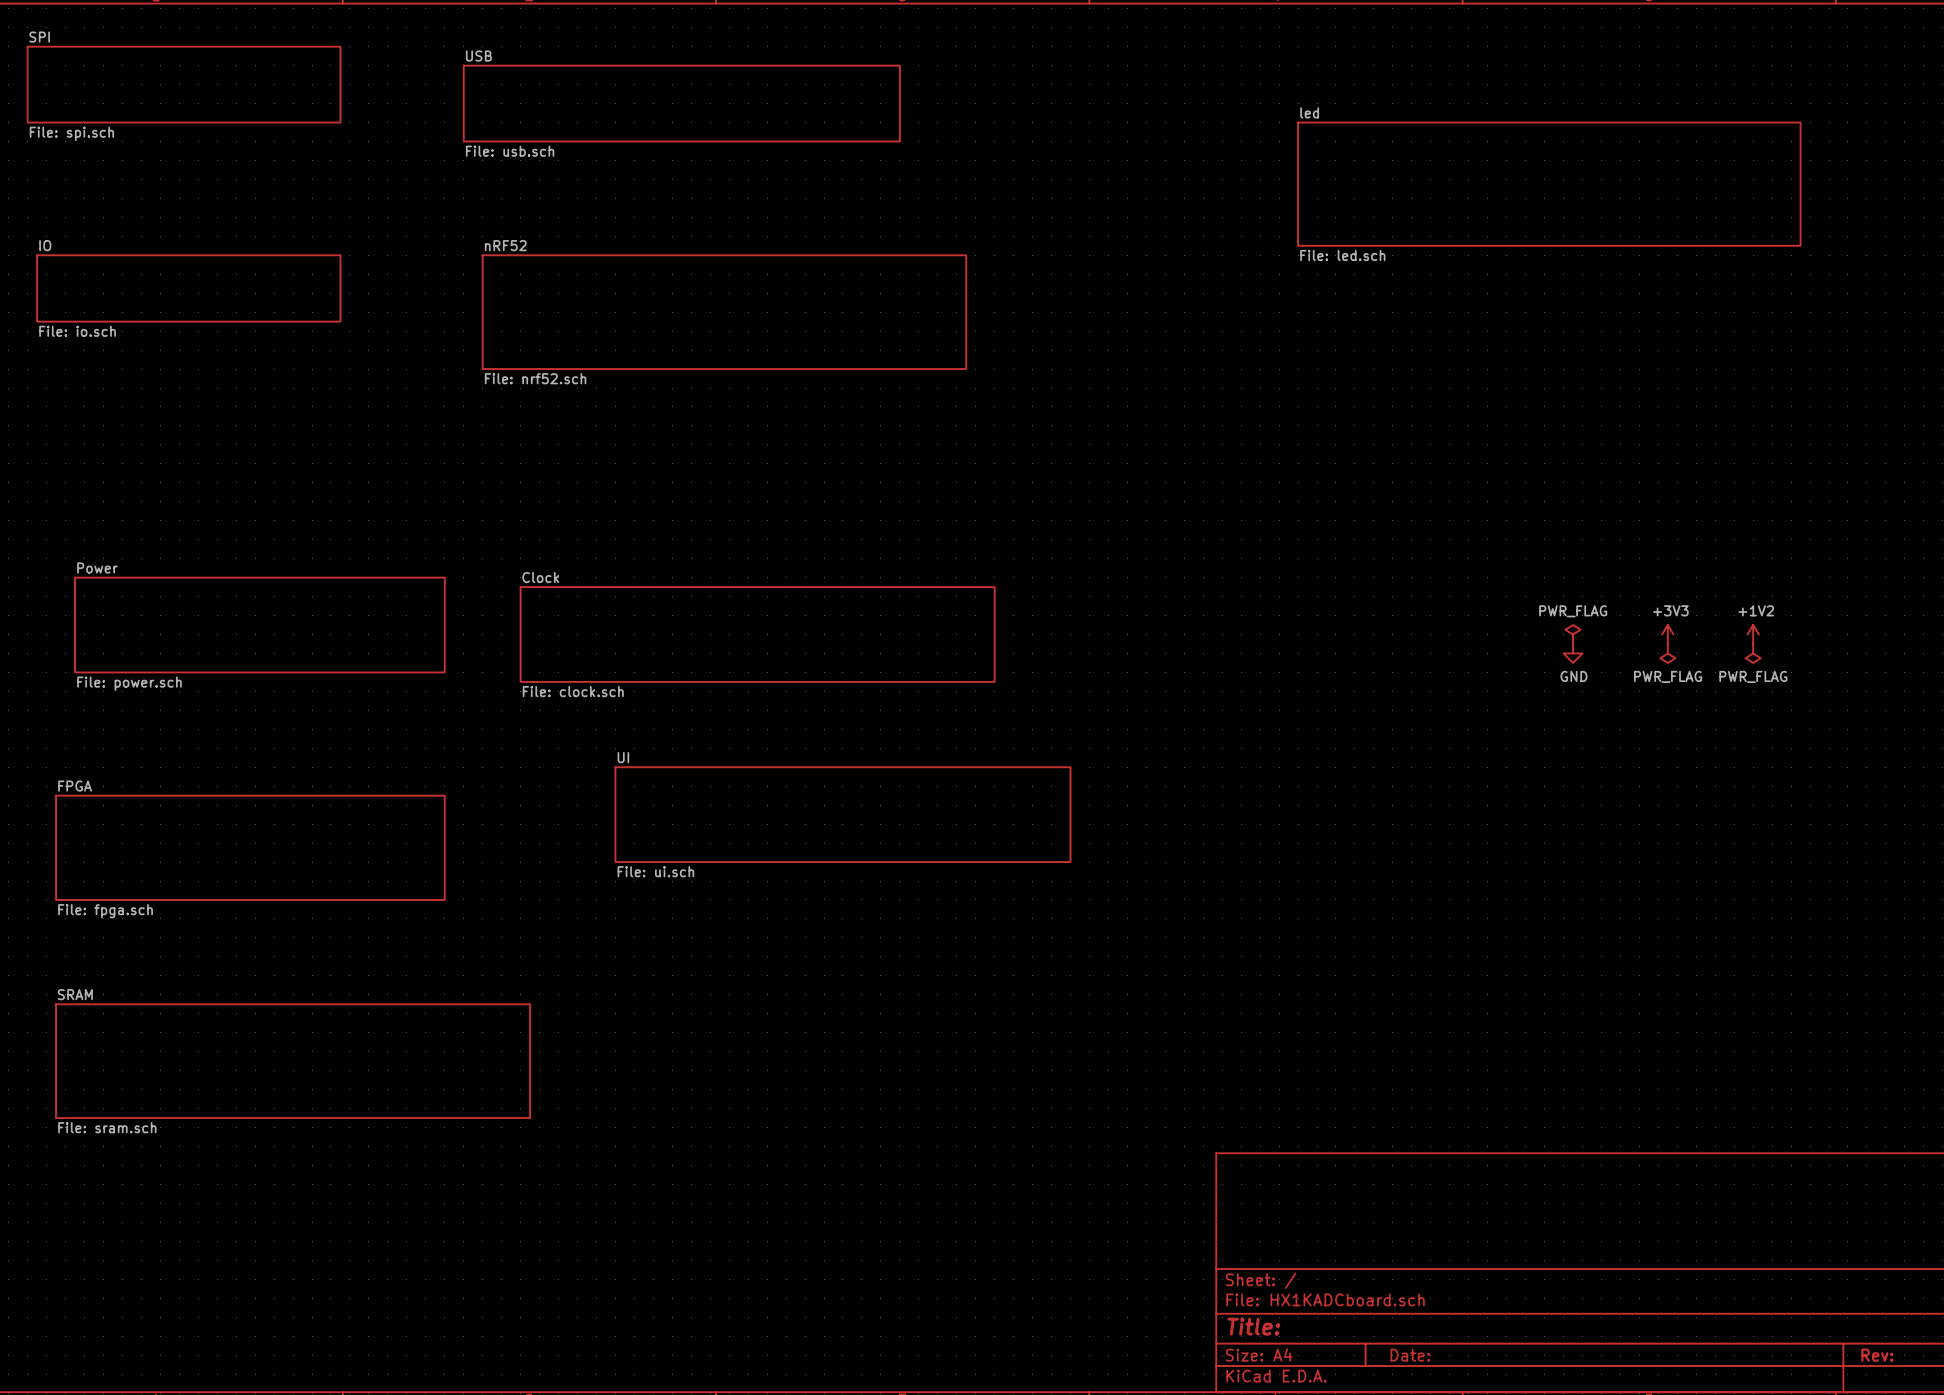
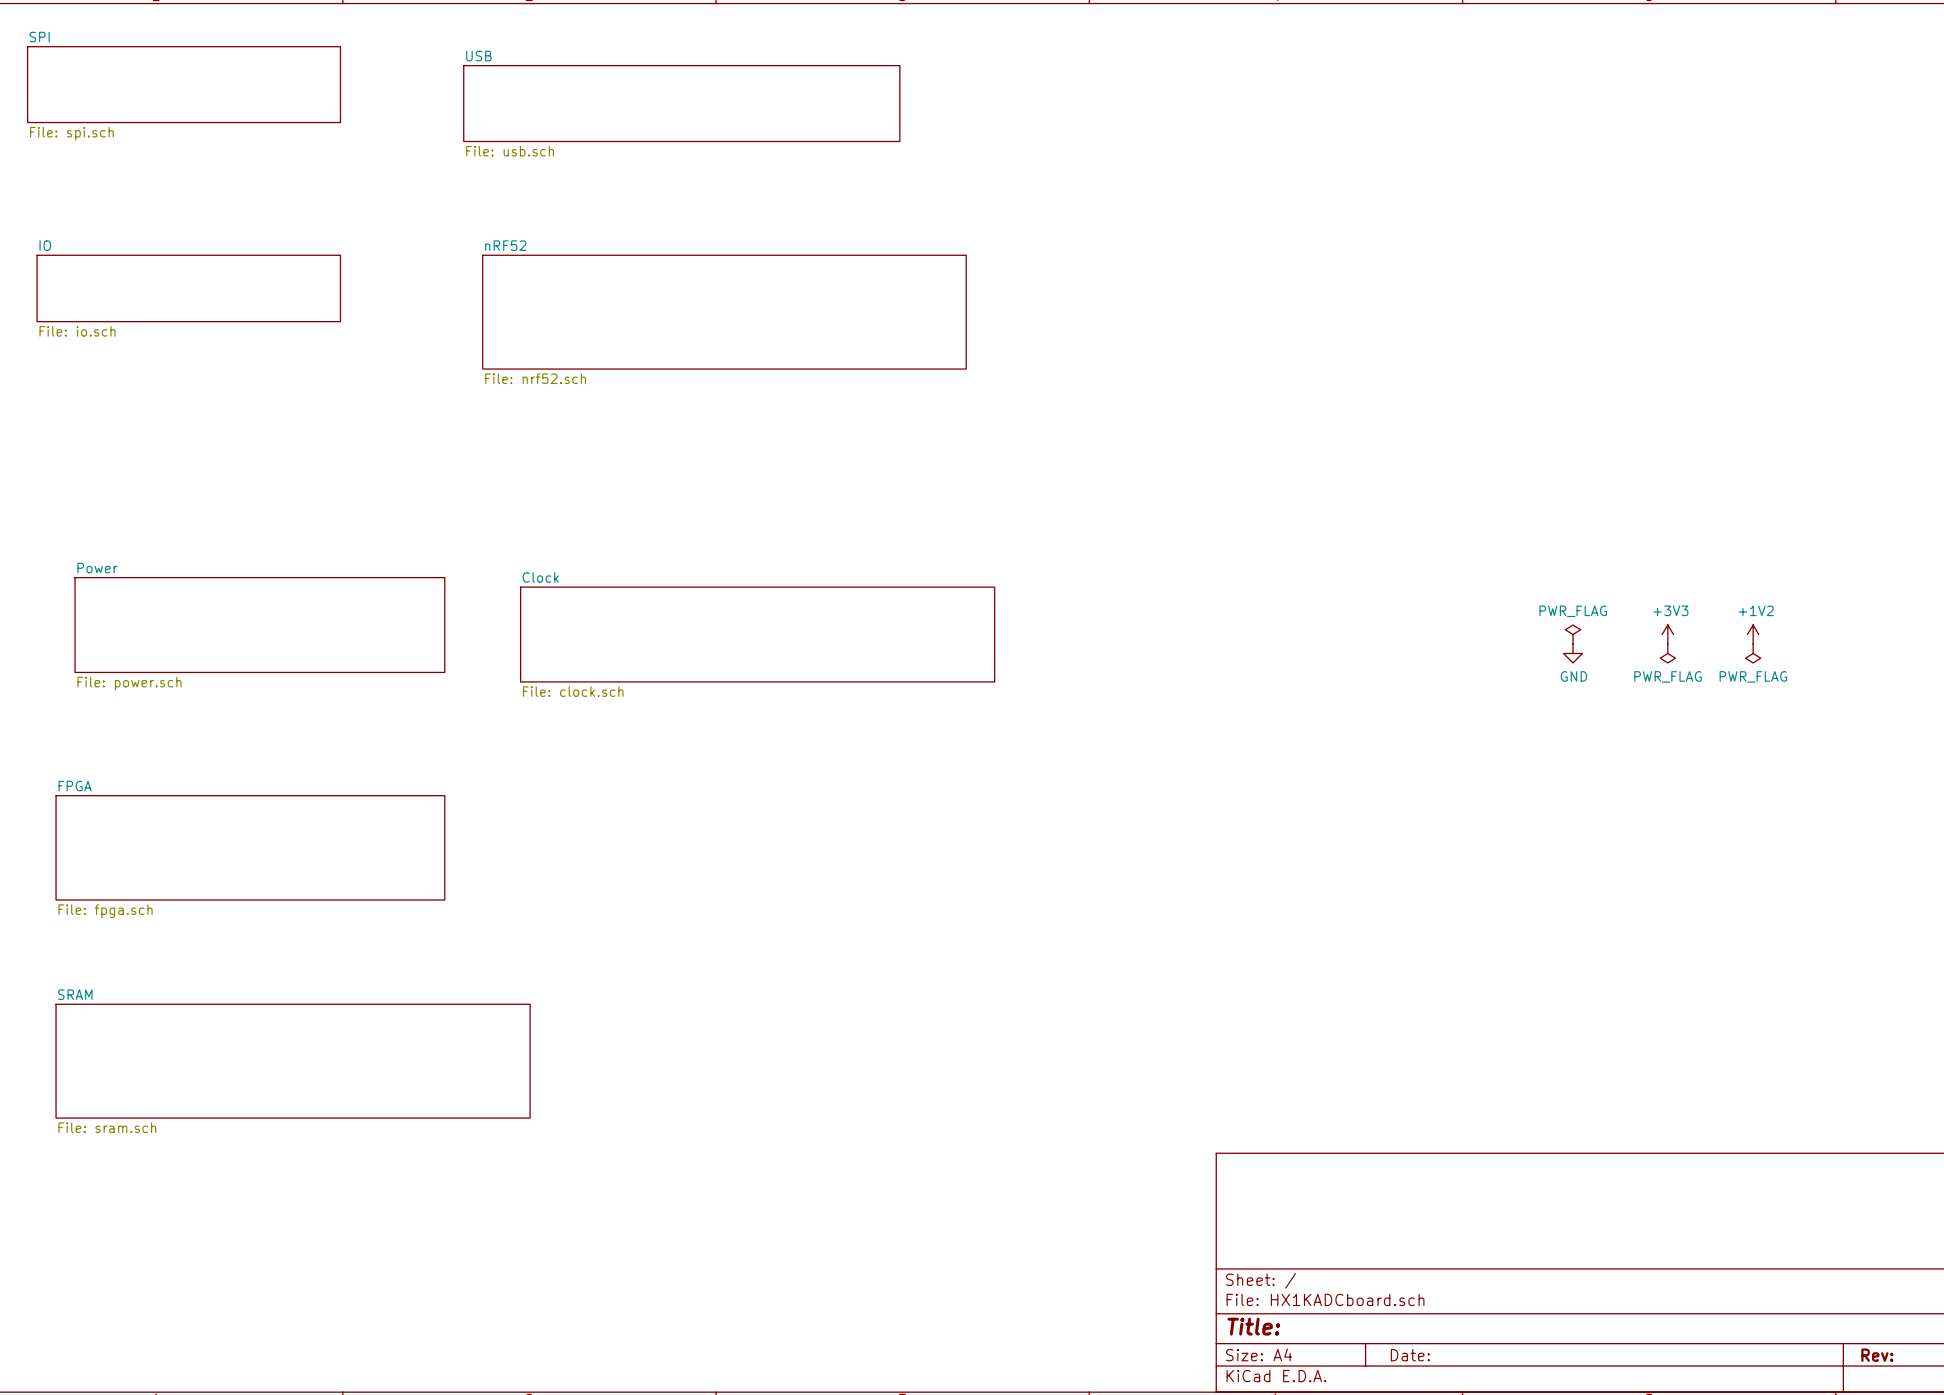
sheet led: File: led.sch (1549, 184) -> none
sheet UI: File: ui.sch (842, 814) -> none

